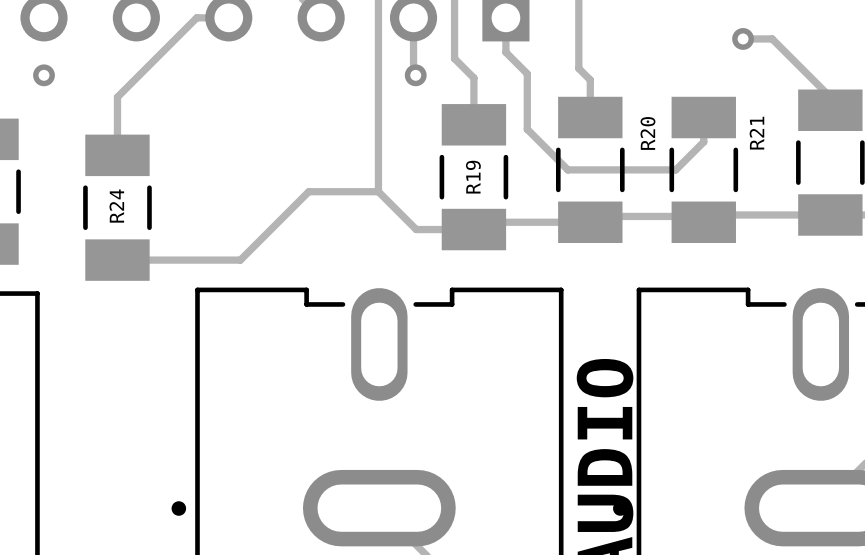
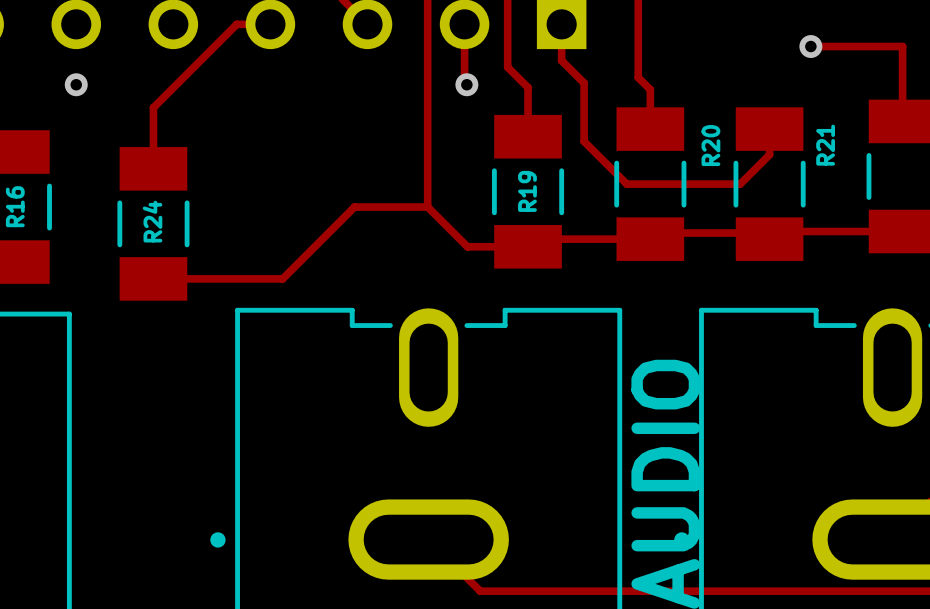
track: (772, 38) (830, 97) -> (841, 46) (902, 46) (902, 107)

